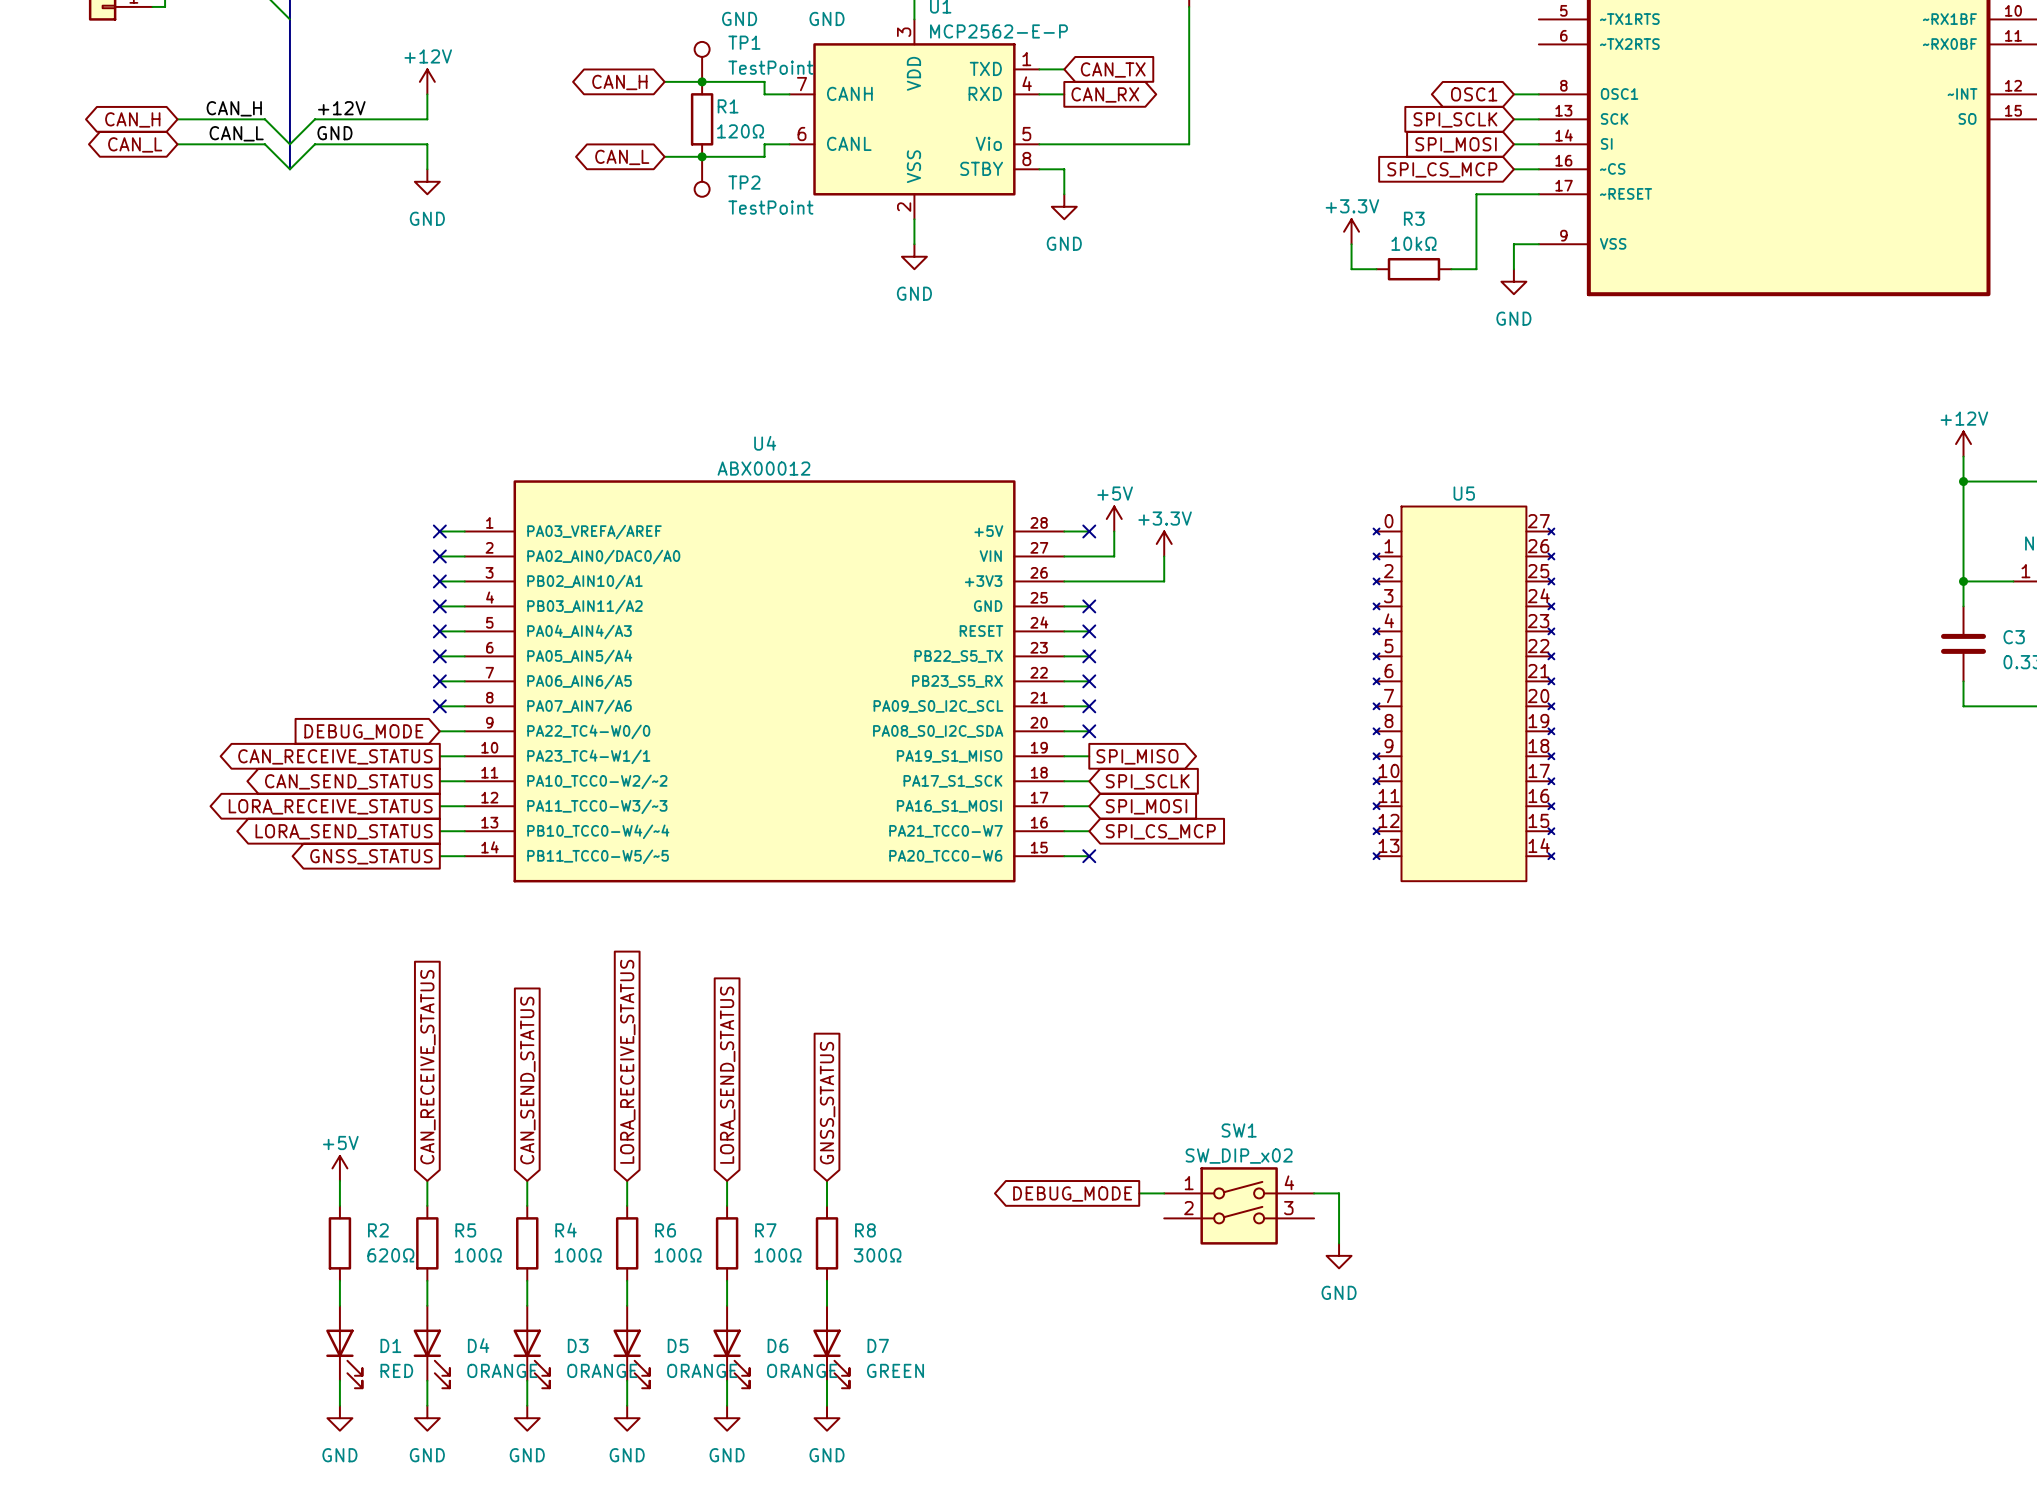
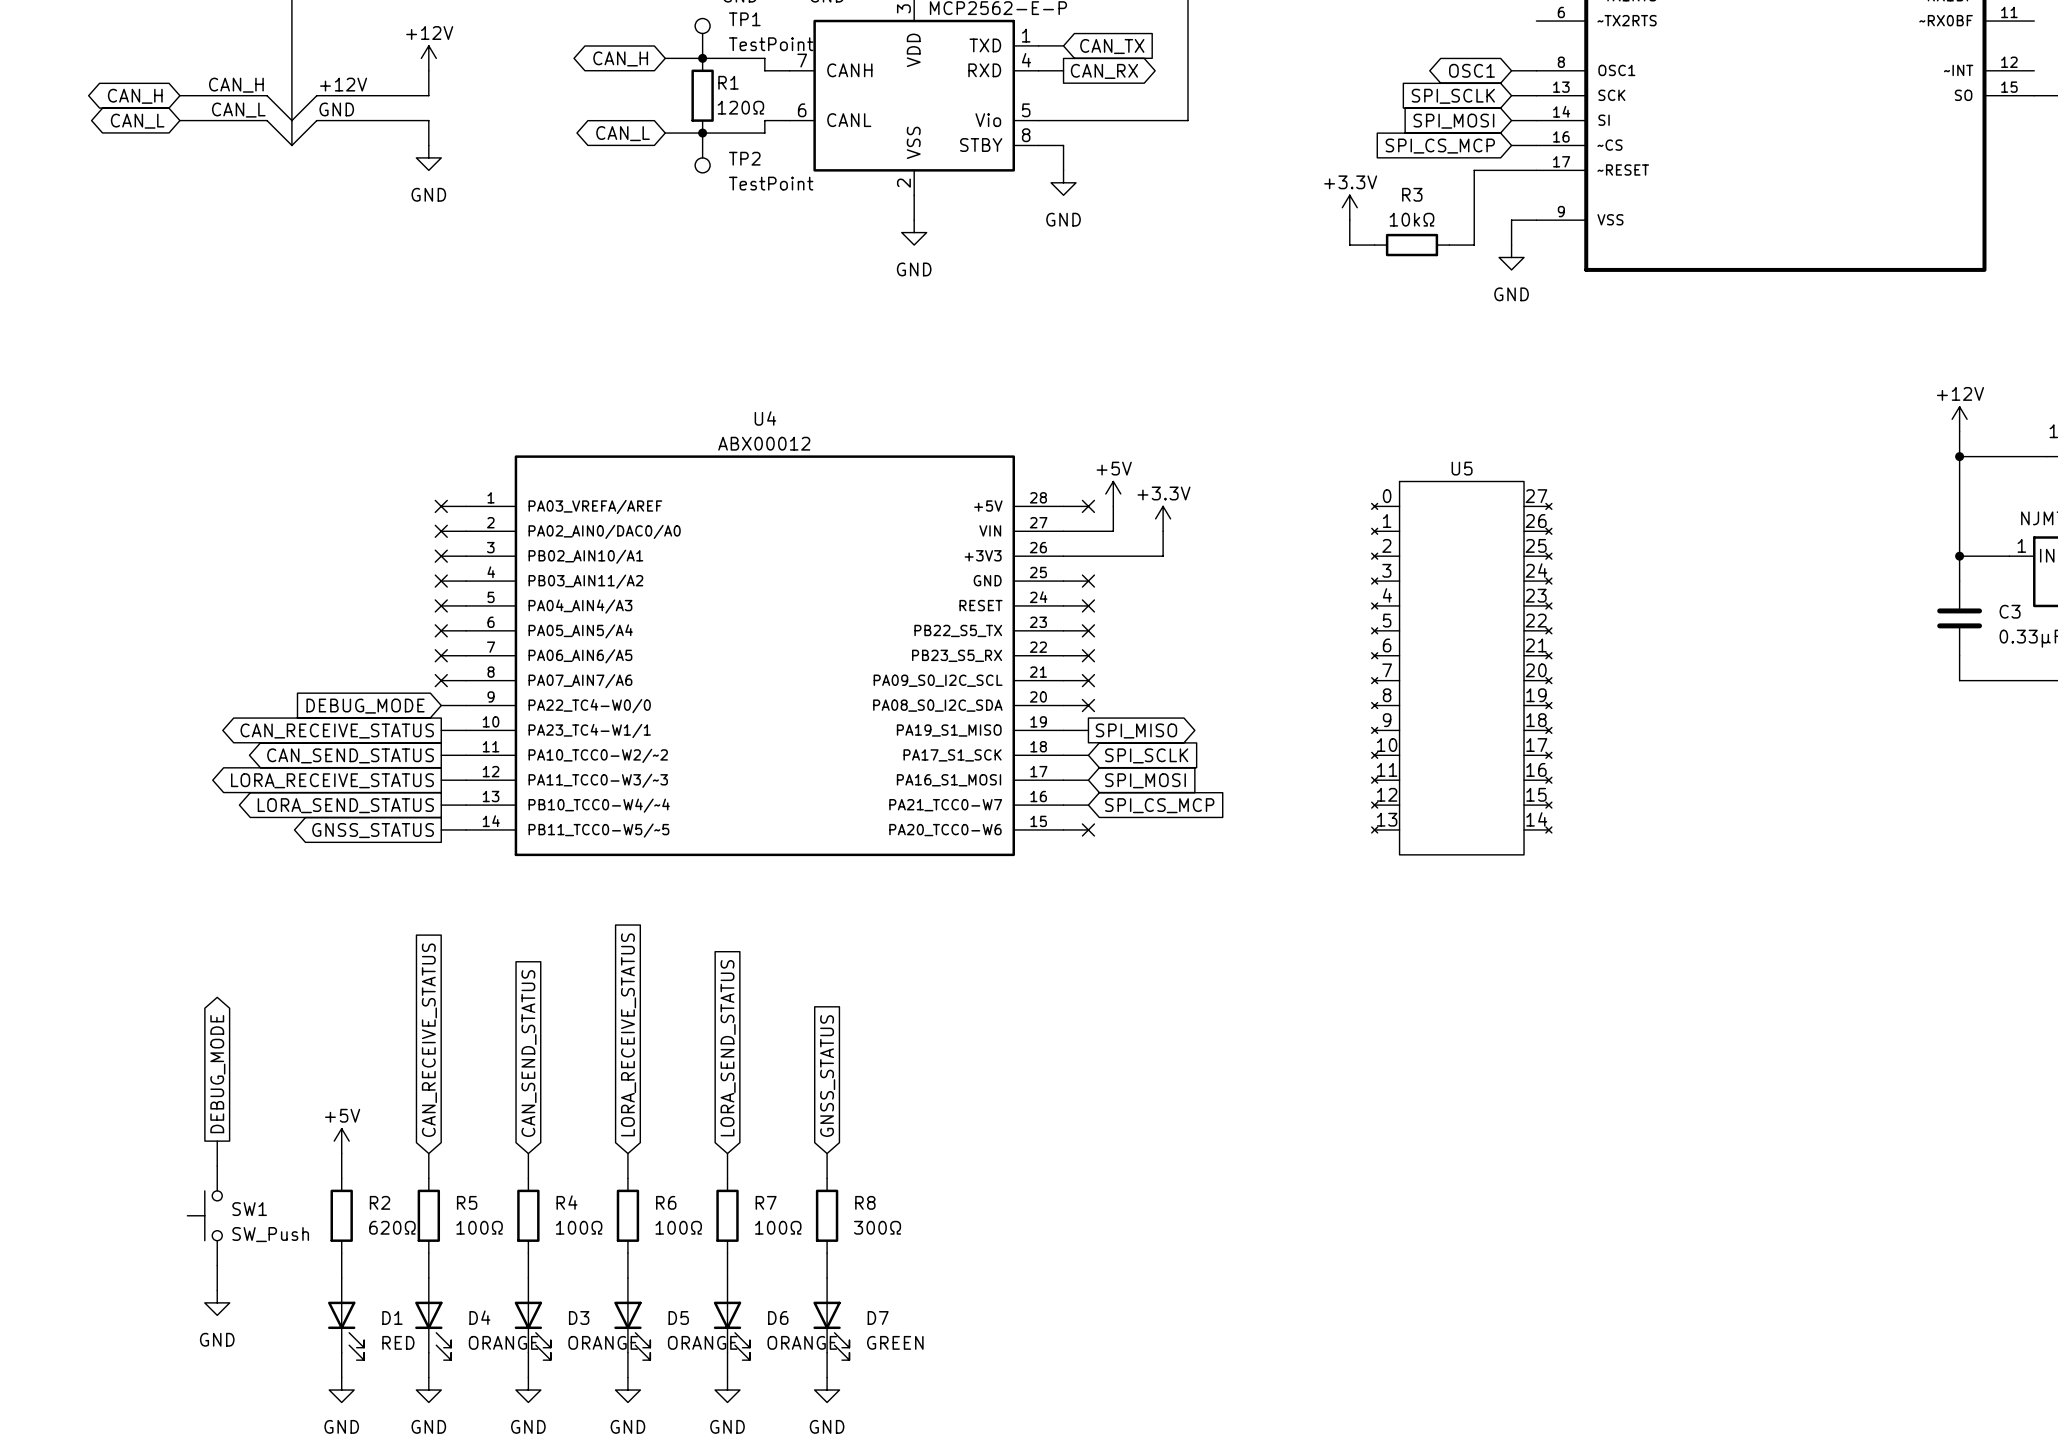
global label: none -> DEBUG_MODE (217, 1074)
SW1 name position: SW1 (1239, 1130) -> SW1 (249, 1209)
SW1 value: SW_DIP_x02 (1239, 1156) -> SW_Push (270, 1234)
SW1 symbol: [1164, 1167, 1315, 1245] -> [187, 1166, 223, 1266]
wire: none -> (217, 1141) (217, 1166)
wire: (1139, 1193) (1164, 1193) -> none
wire: (1314, 1193) (1339, 1193) (1339, 1243) -> none
global label: DEBUG_MODE (1072, 1194) -> none
power symbol: GND (1339, 1255) -> none
wire: none -> (217, 1265) (217, 1290)
power symbol: none -> GND (217, 1302)

